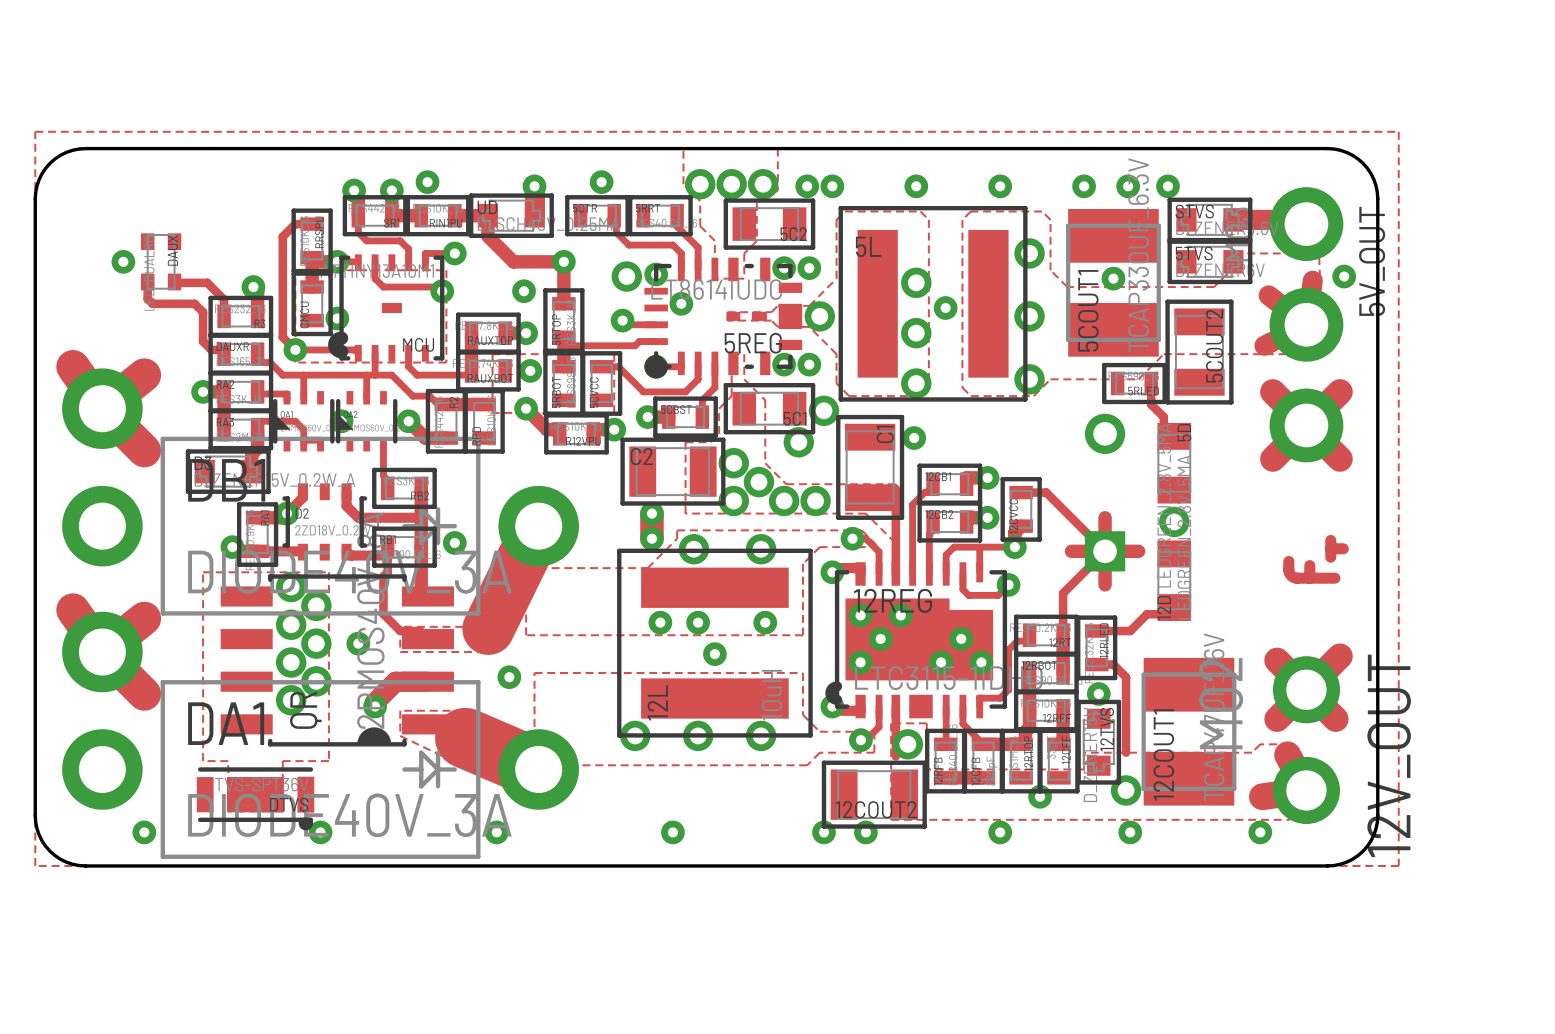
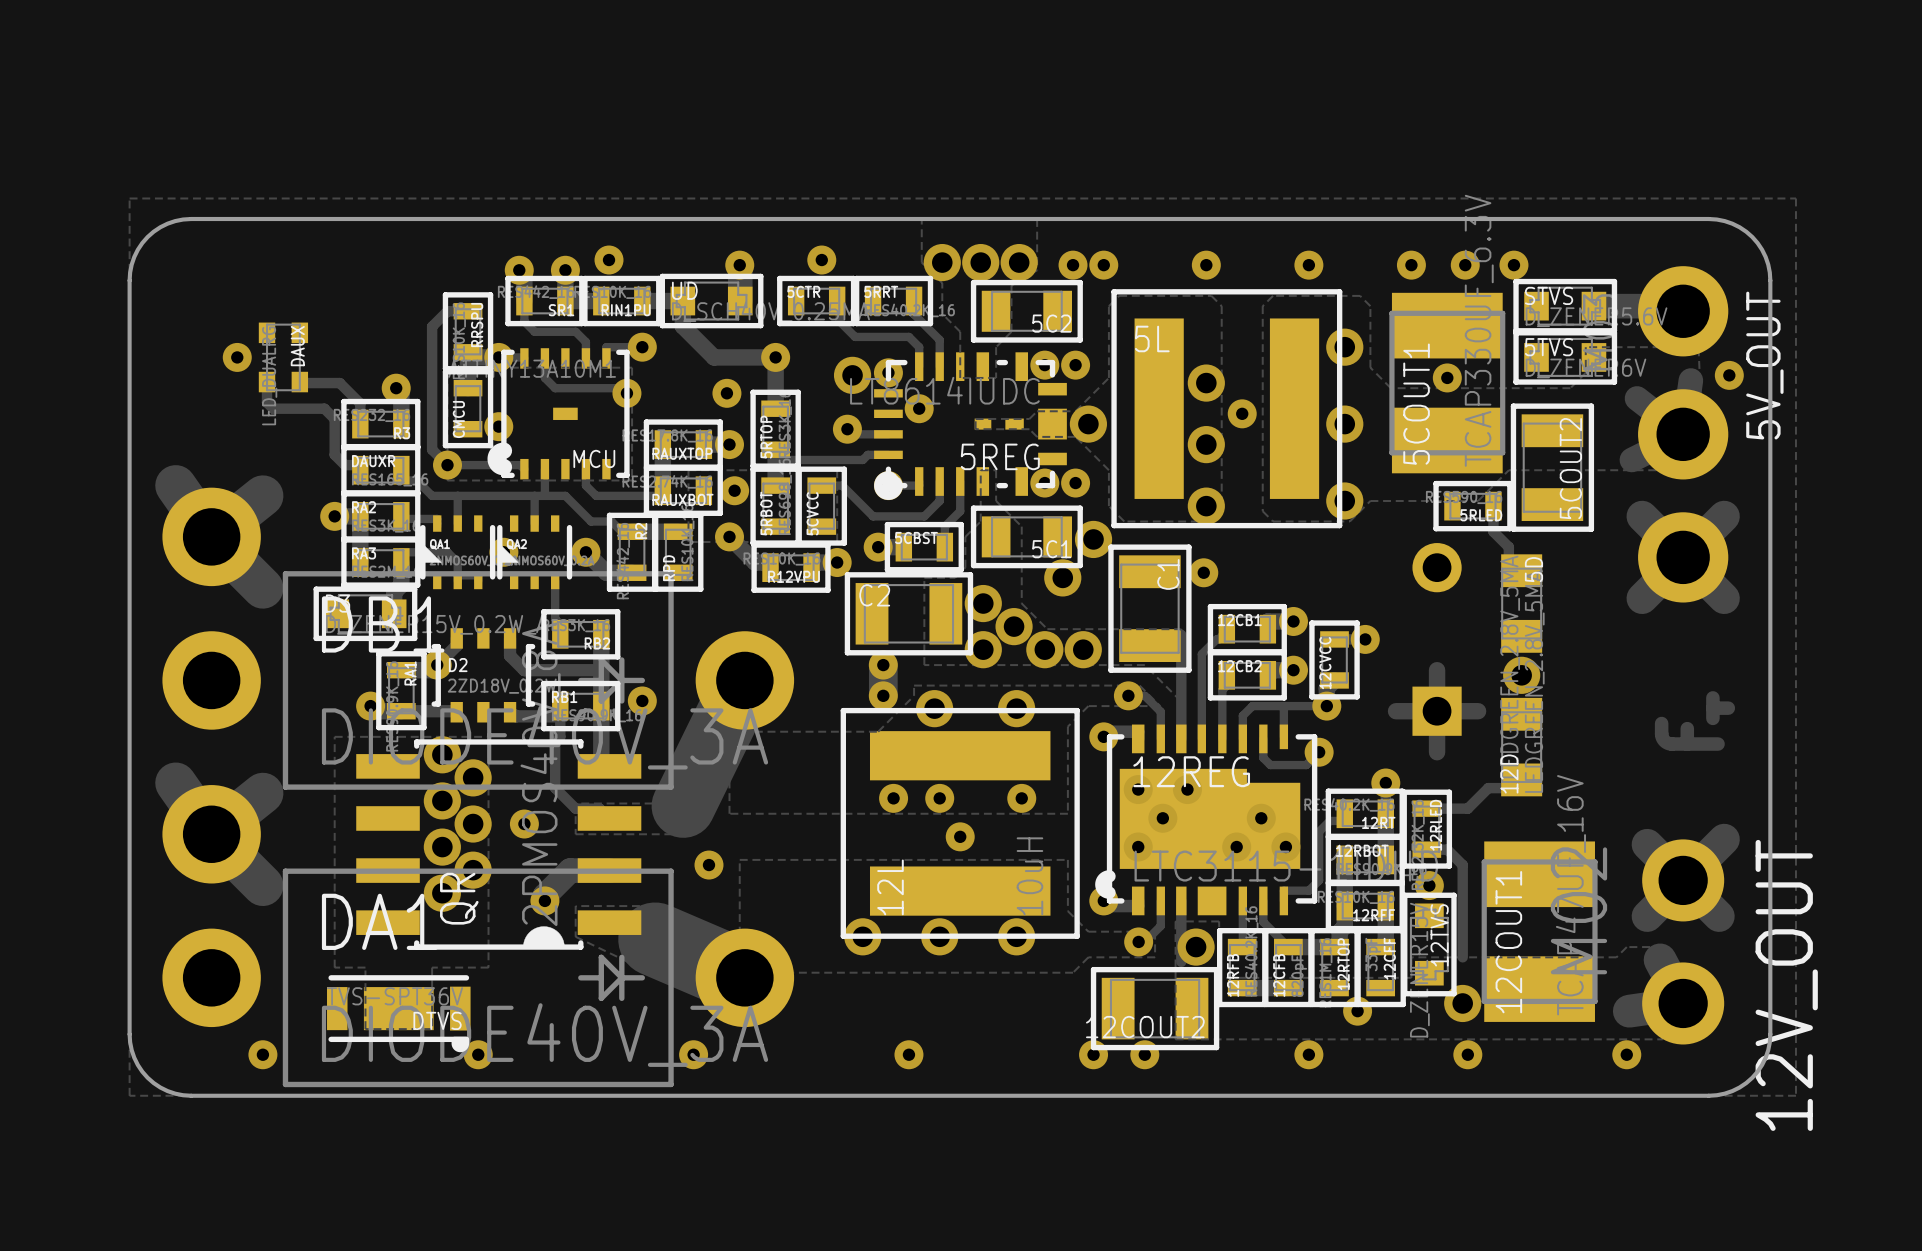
track: (1046, 492) (1088, 534) -> none
via: none -> (1365, 639)
track: (1088, 568) (1063, 593) (1063, 610) -> none
via: none -> (1385, 783)

